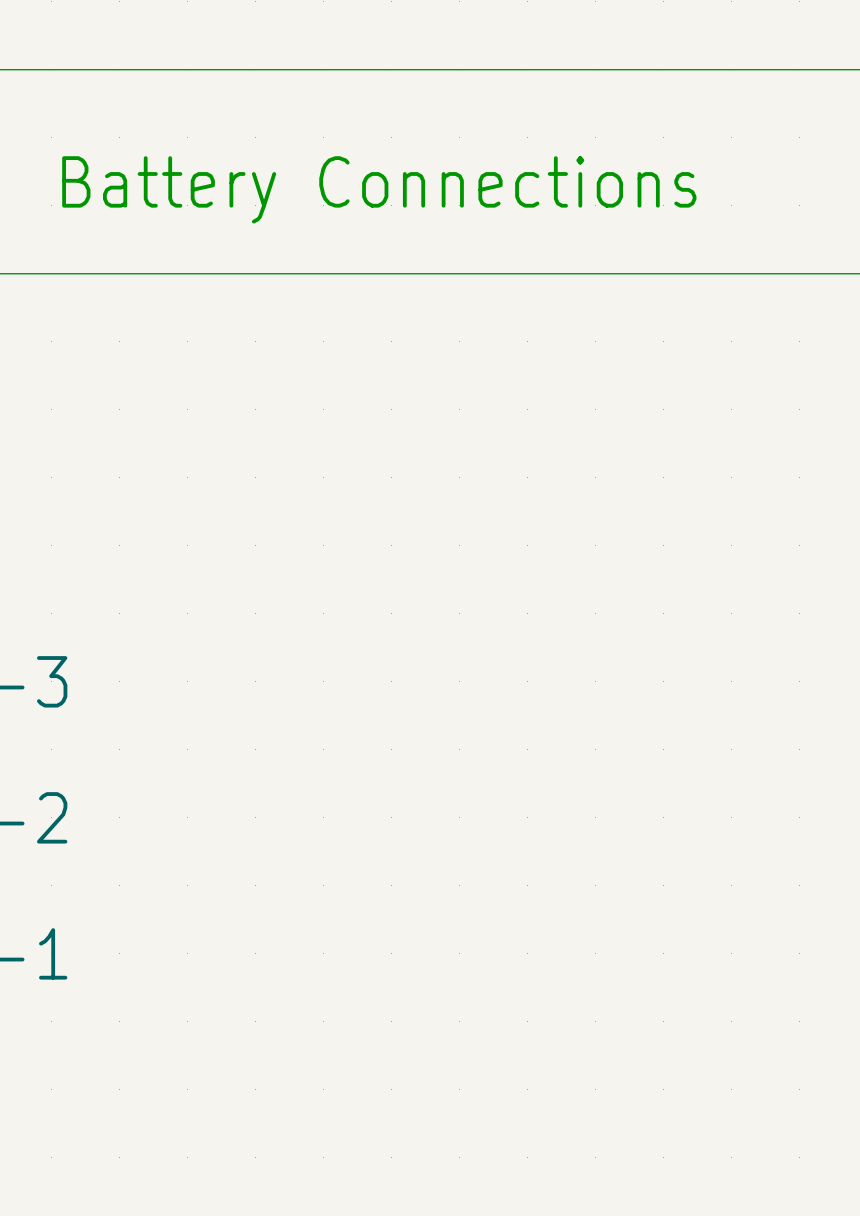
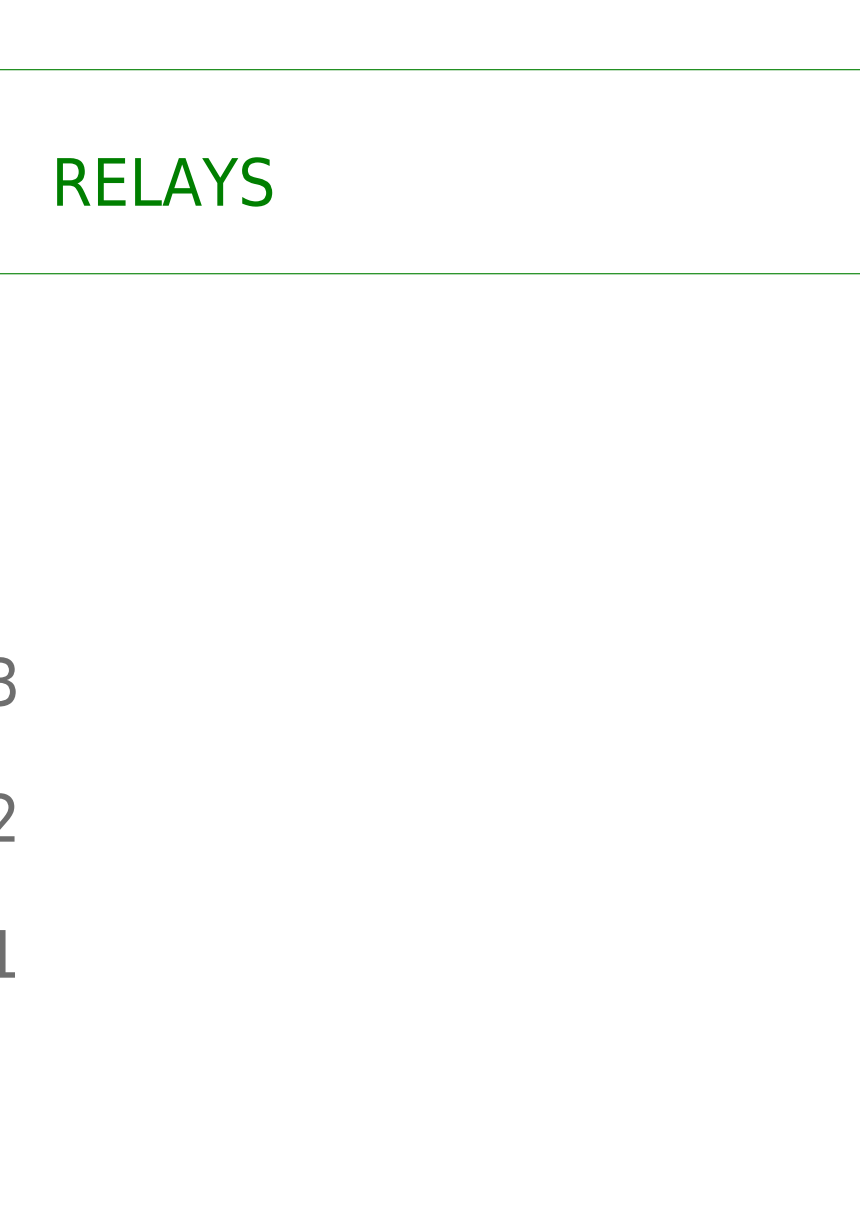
text: Battery Connections (379, 189) -> RELAYS (164, 181)

